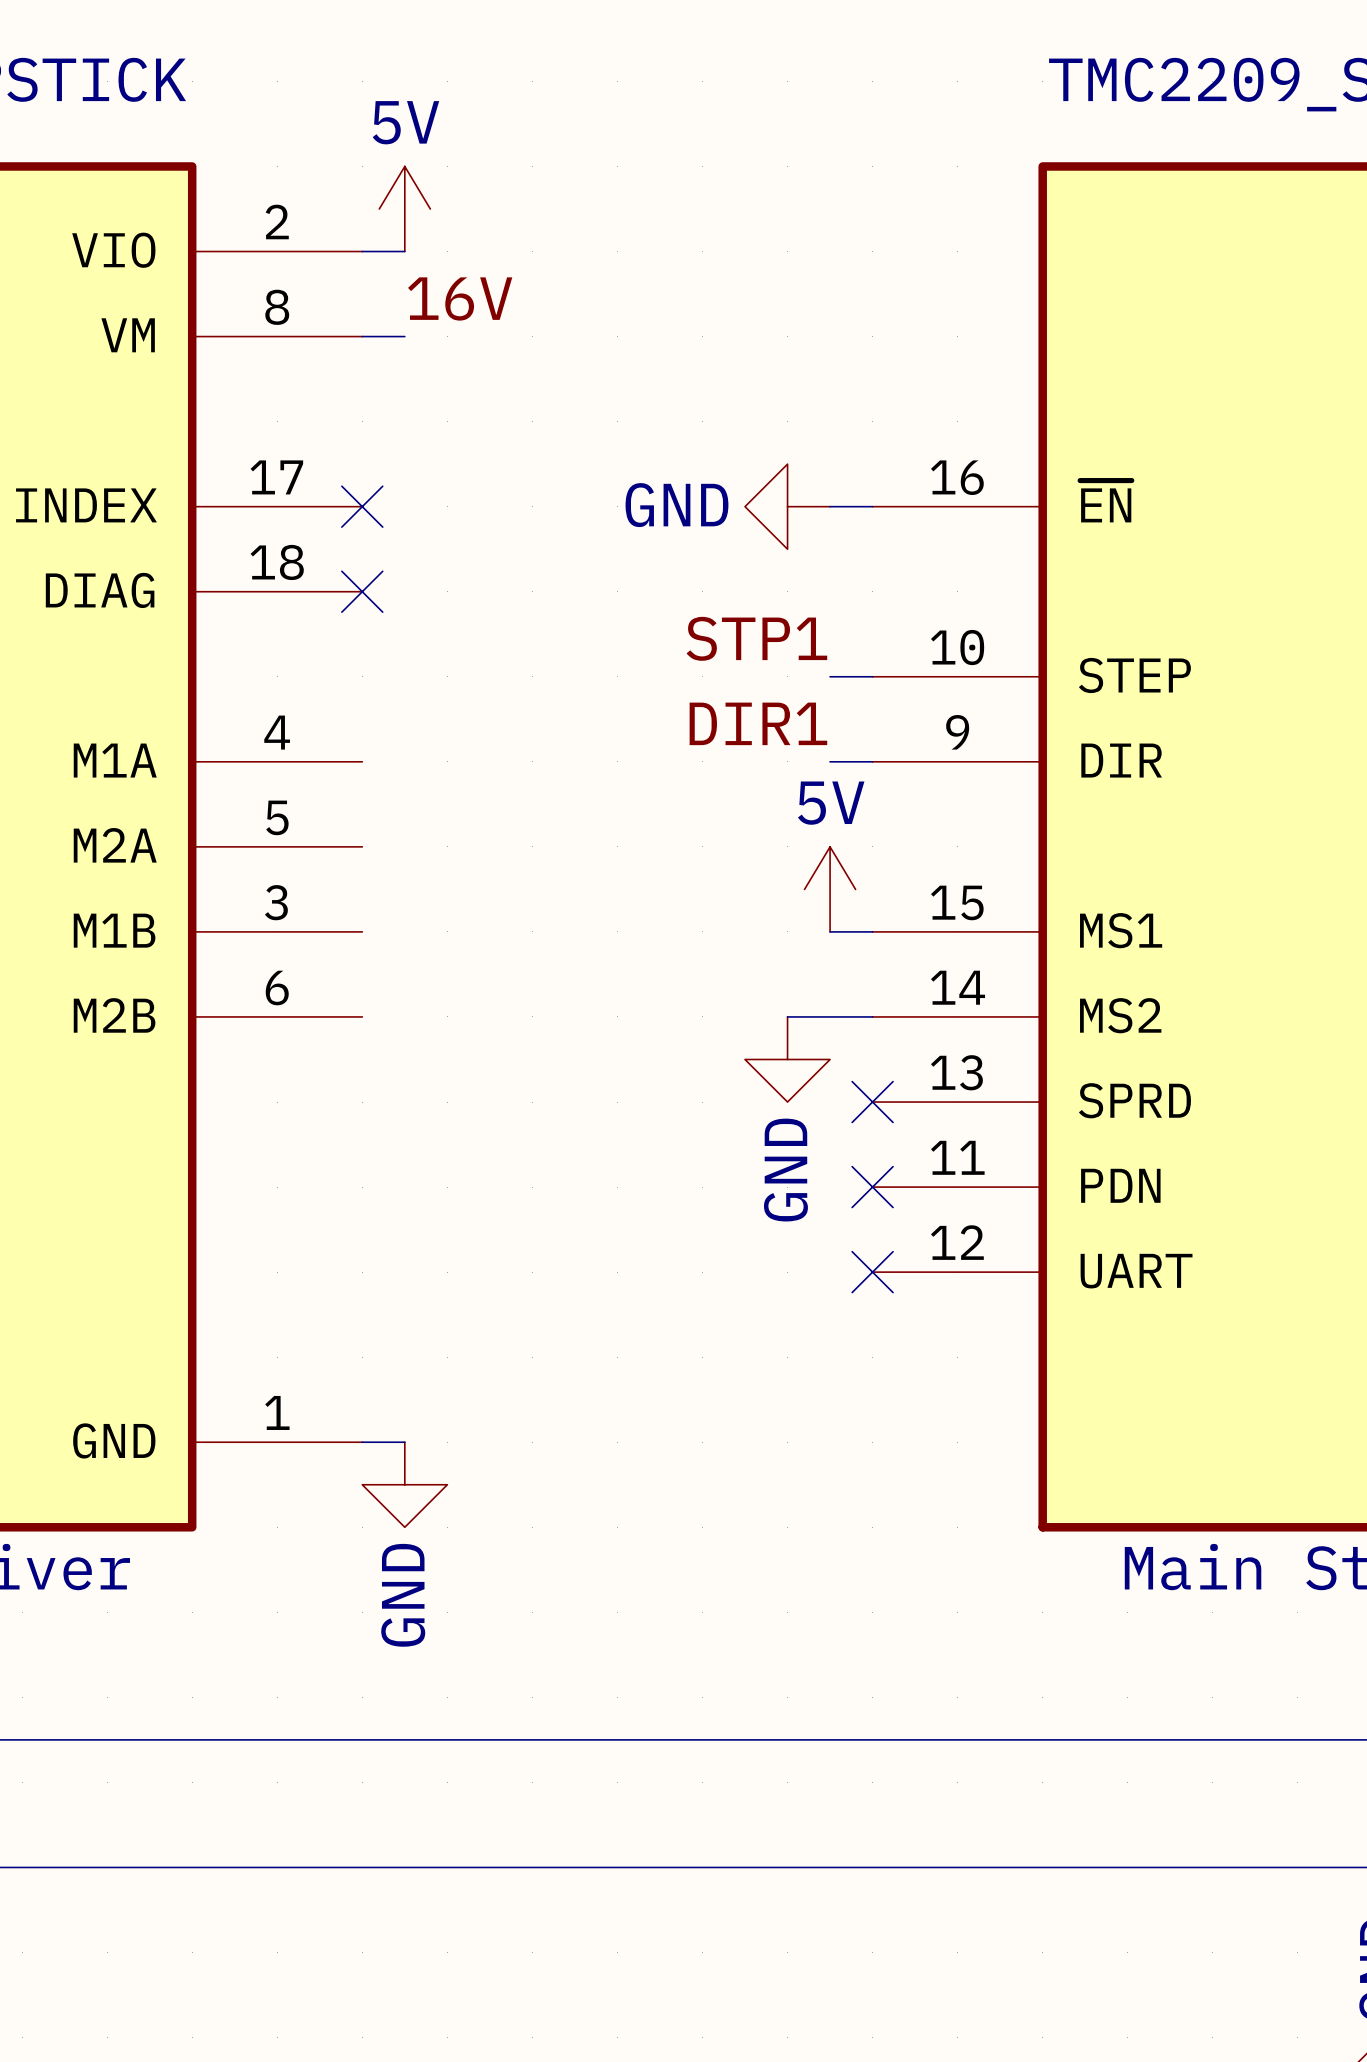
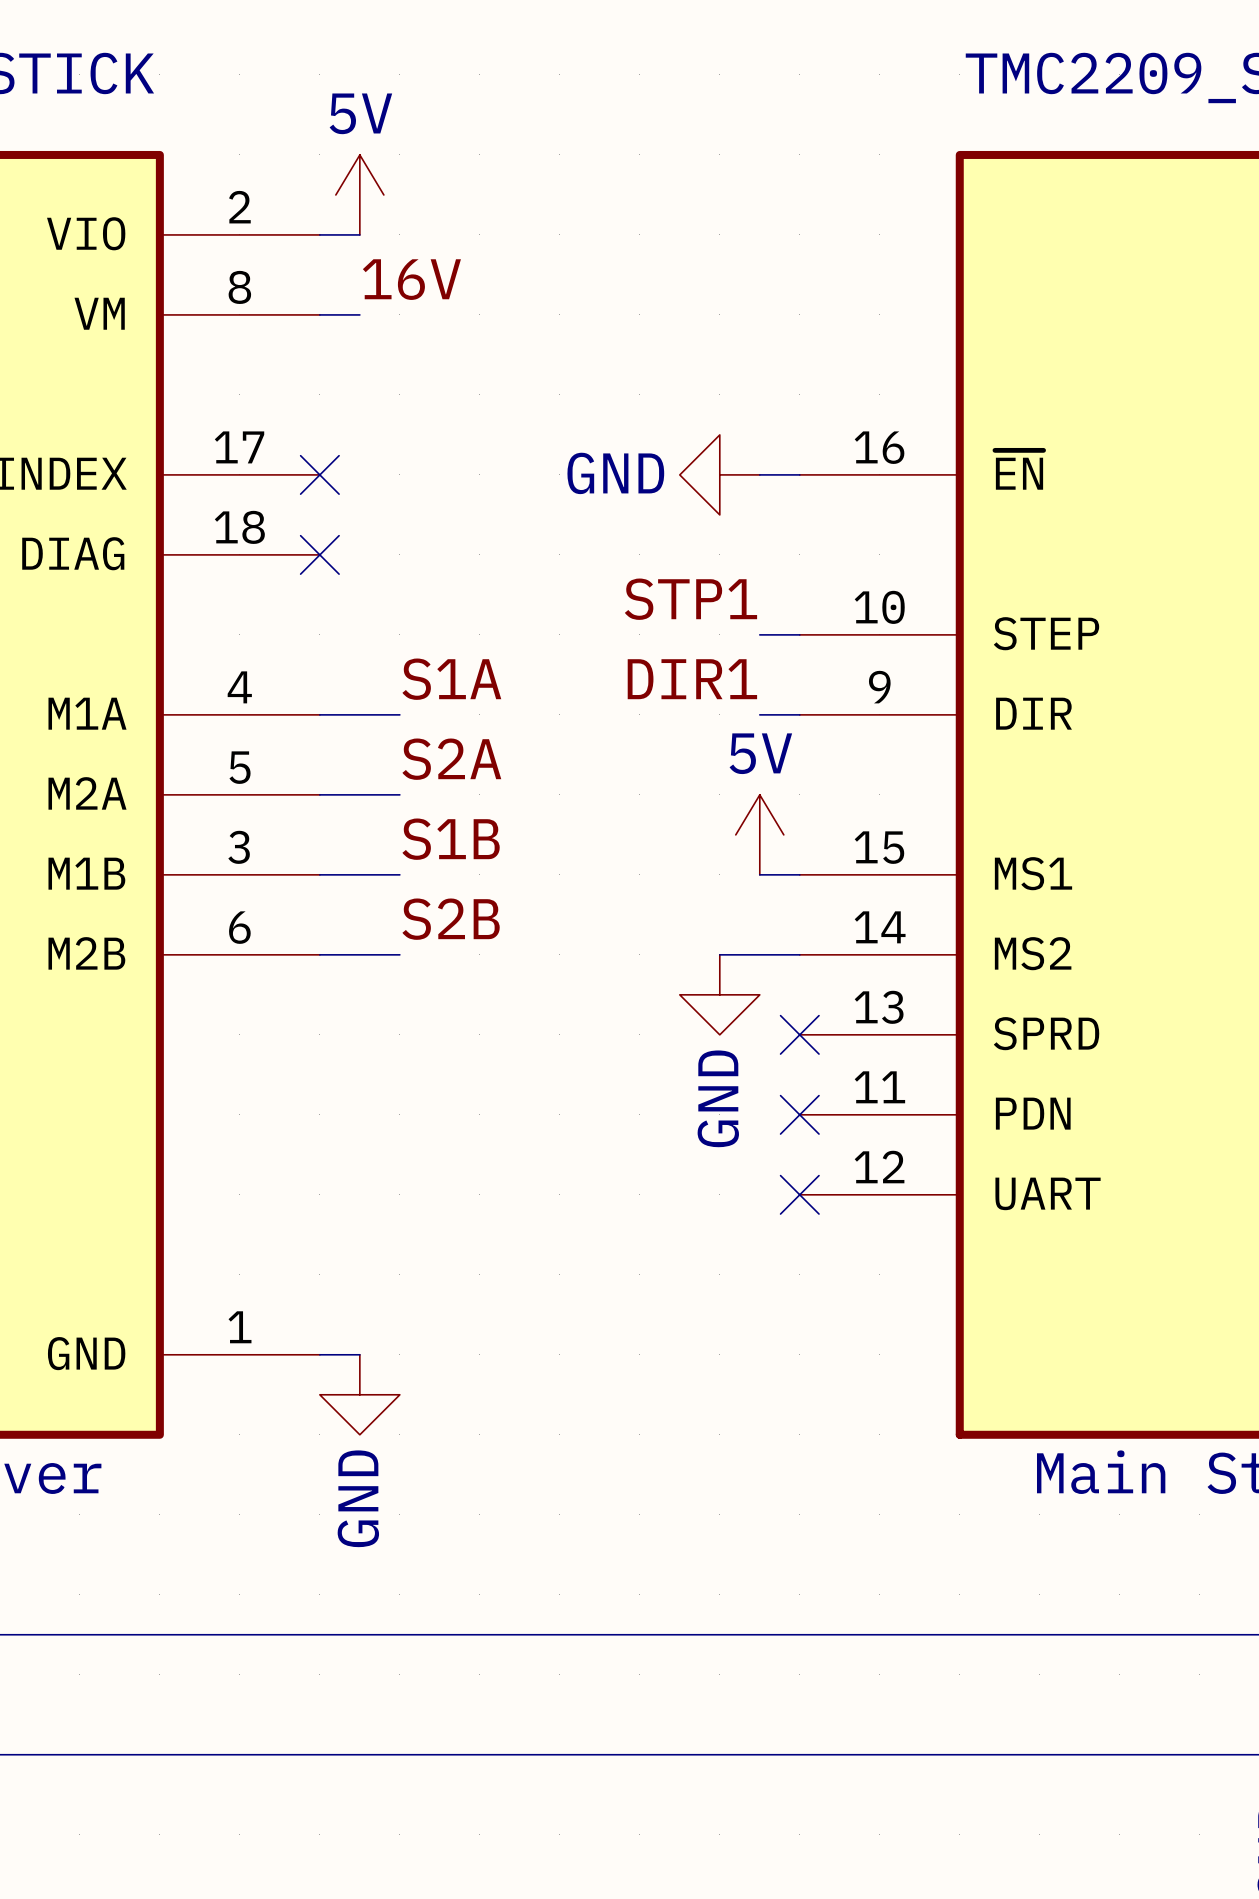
label: none -> S1A (451, 679)
wire: none -> (319, 714) (399, 714)
label: none -> S2A (451, 759)
wire: none -> (319, 794) (399, 794)
label: none -> S1B (451, 839)
wire: none -> (319, 874) (399, 874)
label: none -> S2B (451, 919)
wire: none -> (319, 954) (399, 954)

